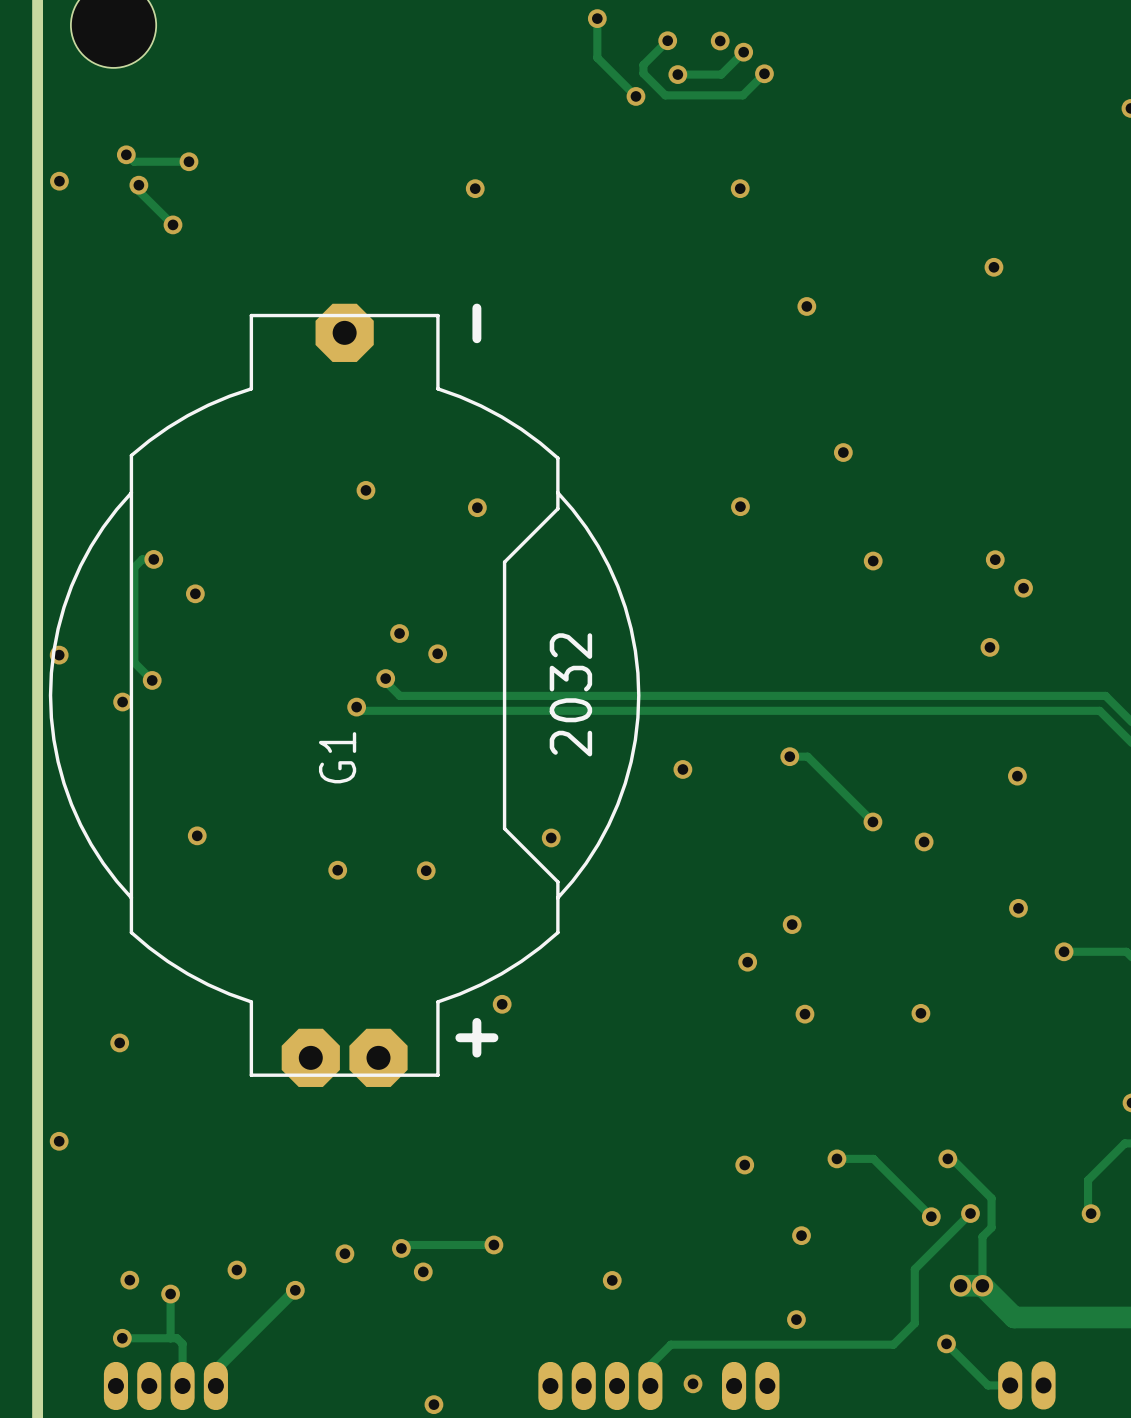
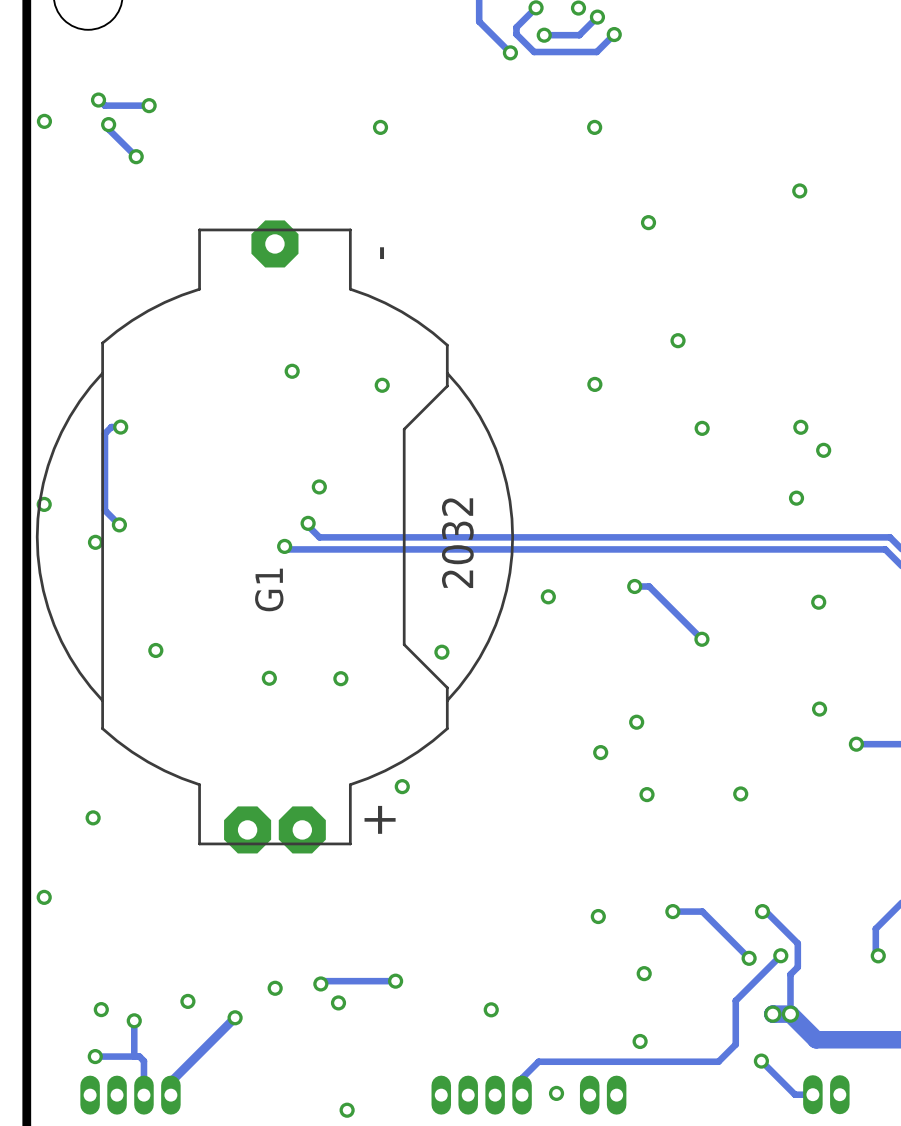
via: (195, 593) -> none
via: (437, 653) -> none
via: (924, 841) -> none

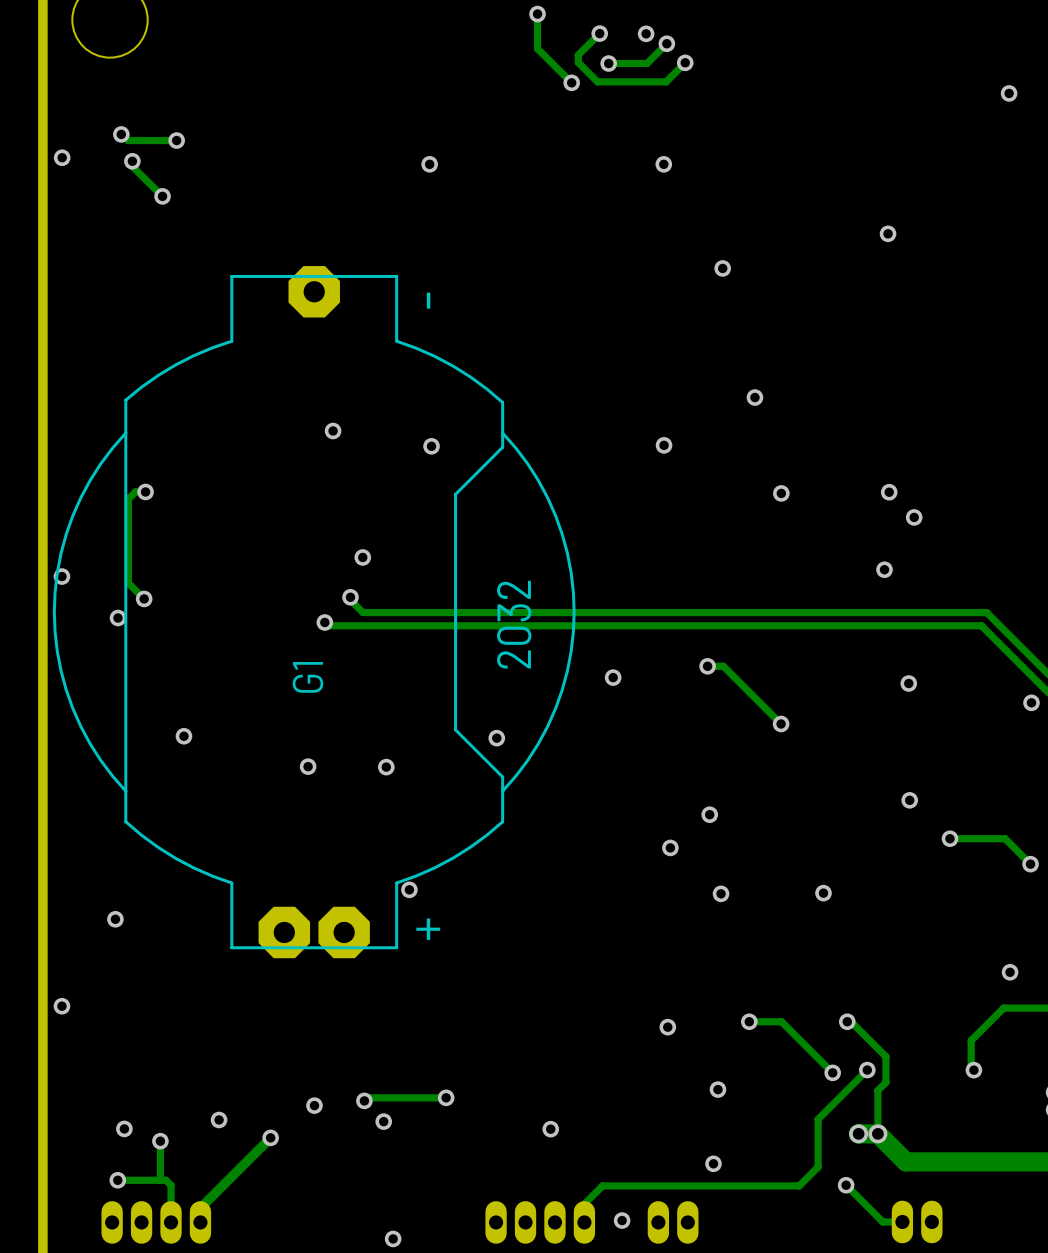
via position: (402, 786) -> (409, 889)

